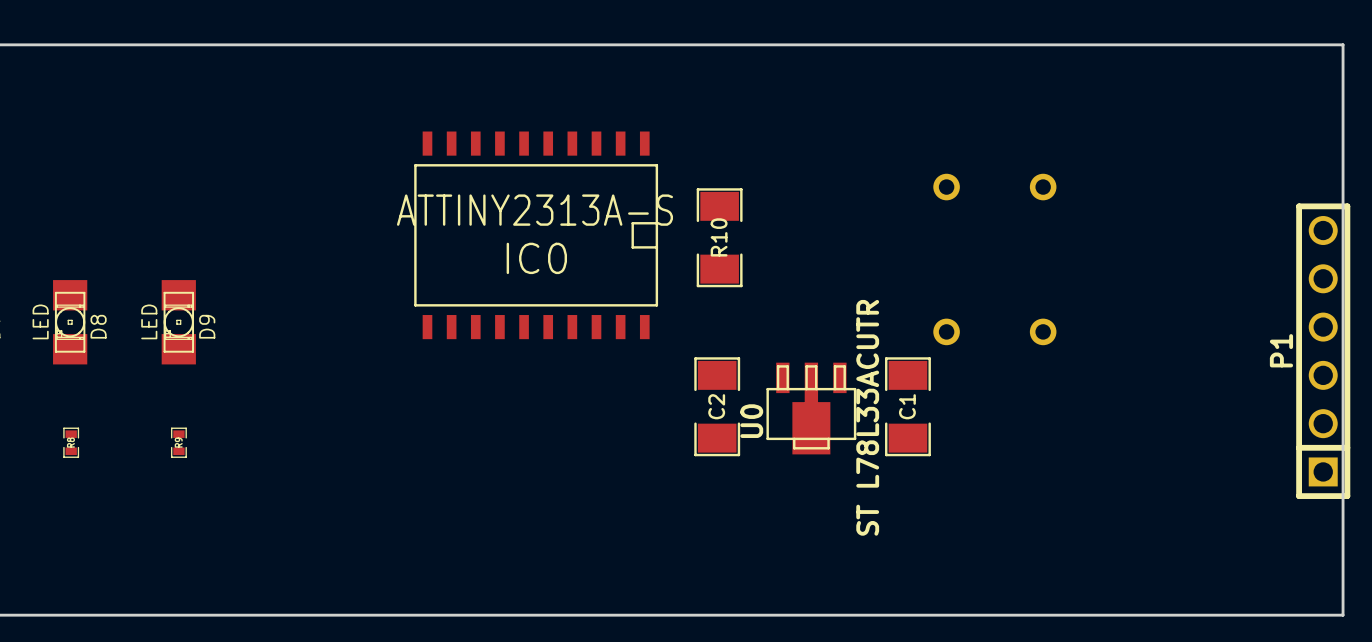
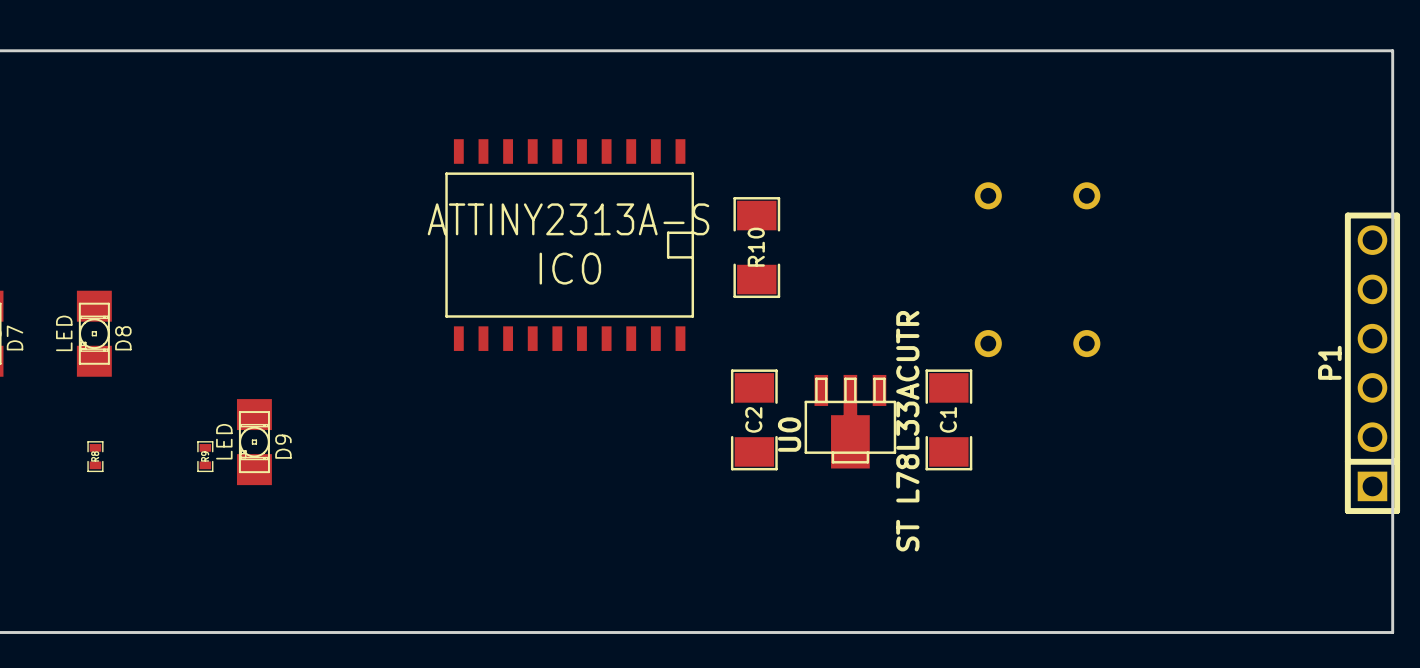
D9 position: (178, 322) -> (254, 442)

